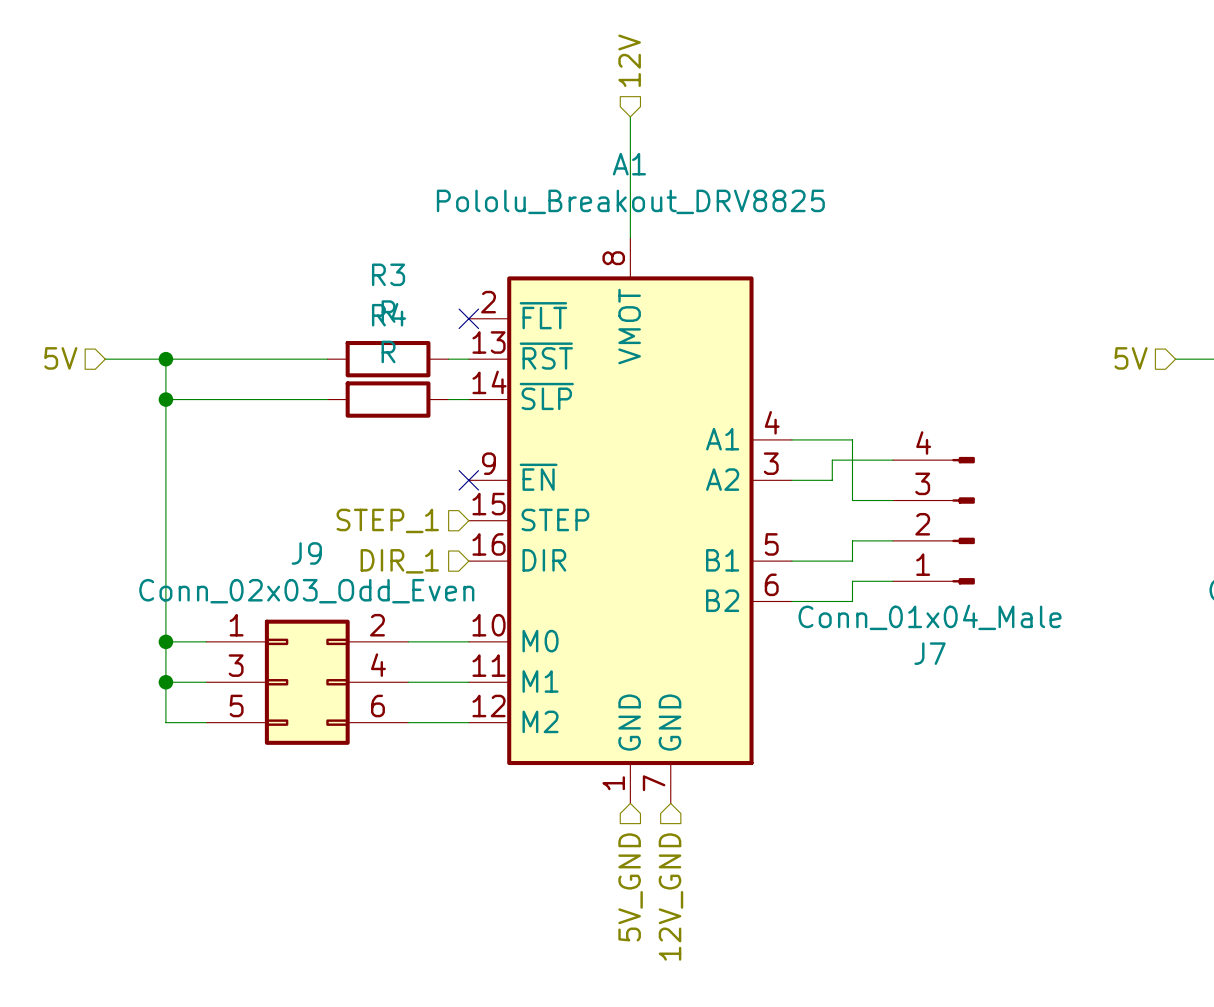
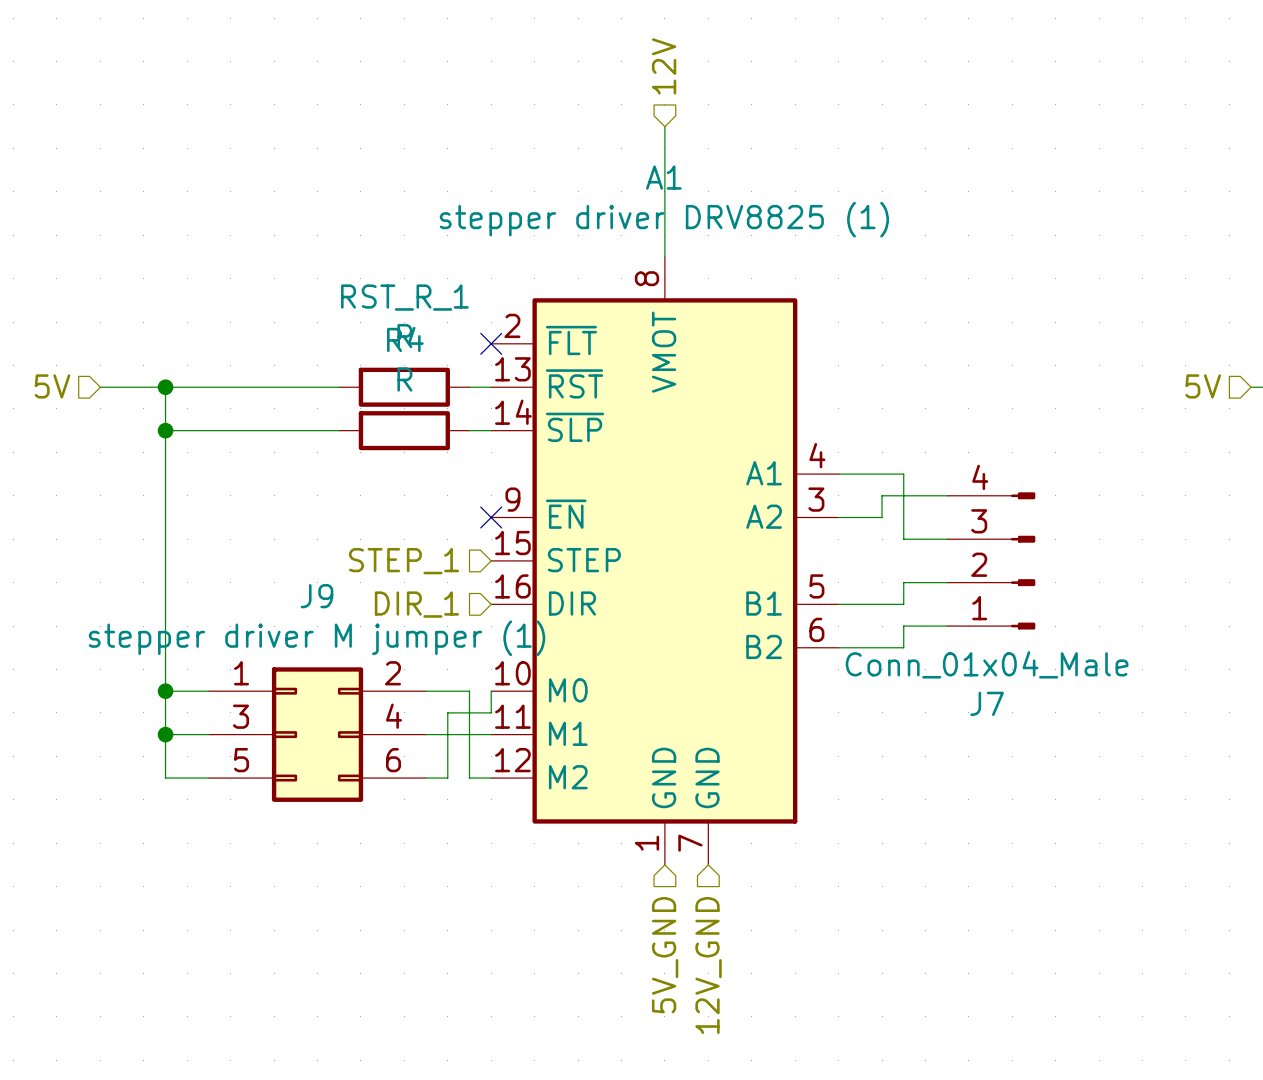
A1 value: Pololu_Breakout_DRV8825 (630, 201) -> stepper driver DRV8825 (1) (664, 219)
R3 name: R3 (388, 274) -> RST_R_1 (404, 297)
J9 value: Conn_02x03_Odd_Even (306, 591) -> stepper driver M jumper (1) (317, 638)
wire: (448, 641) (468, 641) -> (469, 691) (469, 778)
wire: (428, 722) (448, 722) -> (447, 778) (447, 712) (491, 712) (491, 691)

